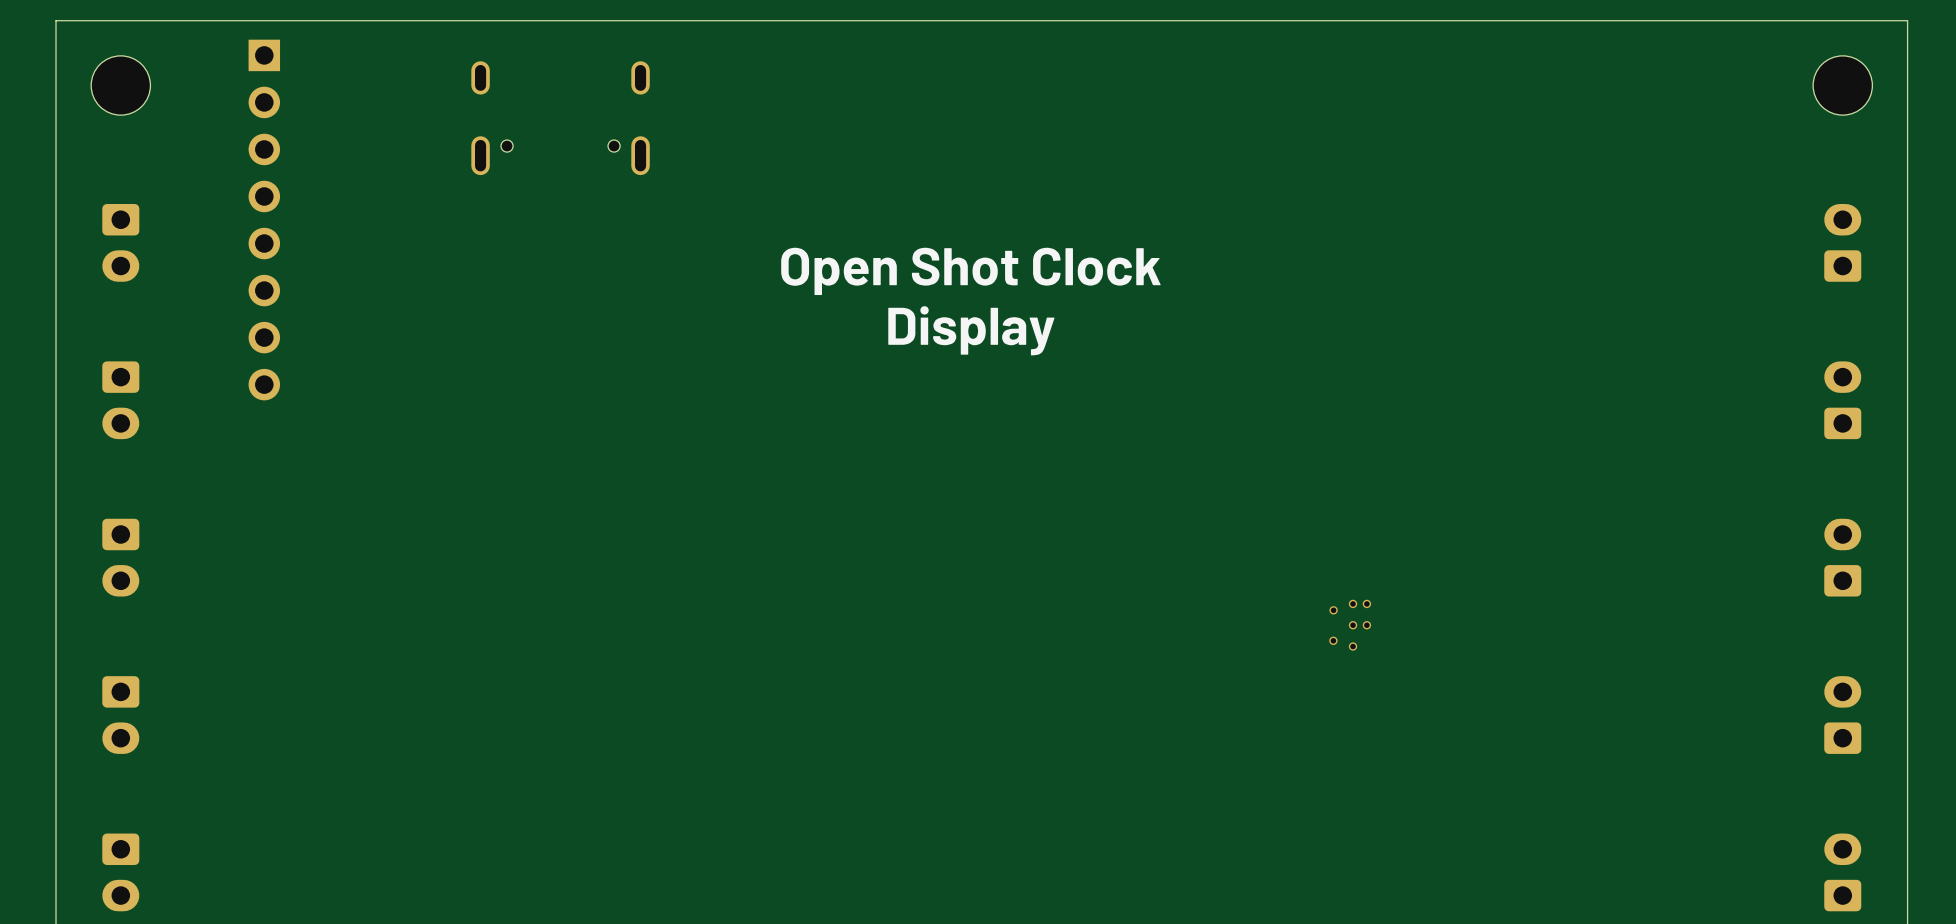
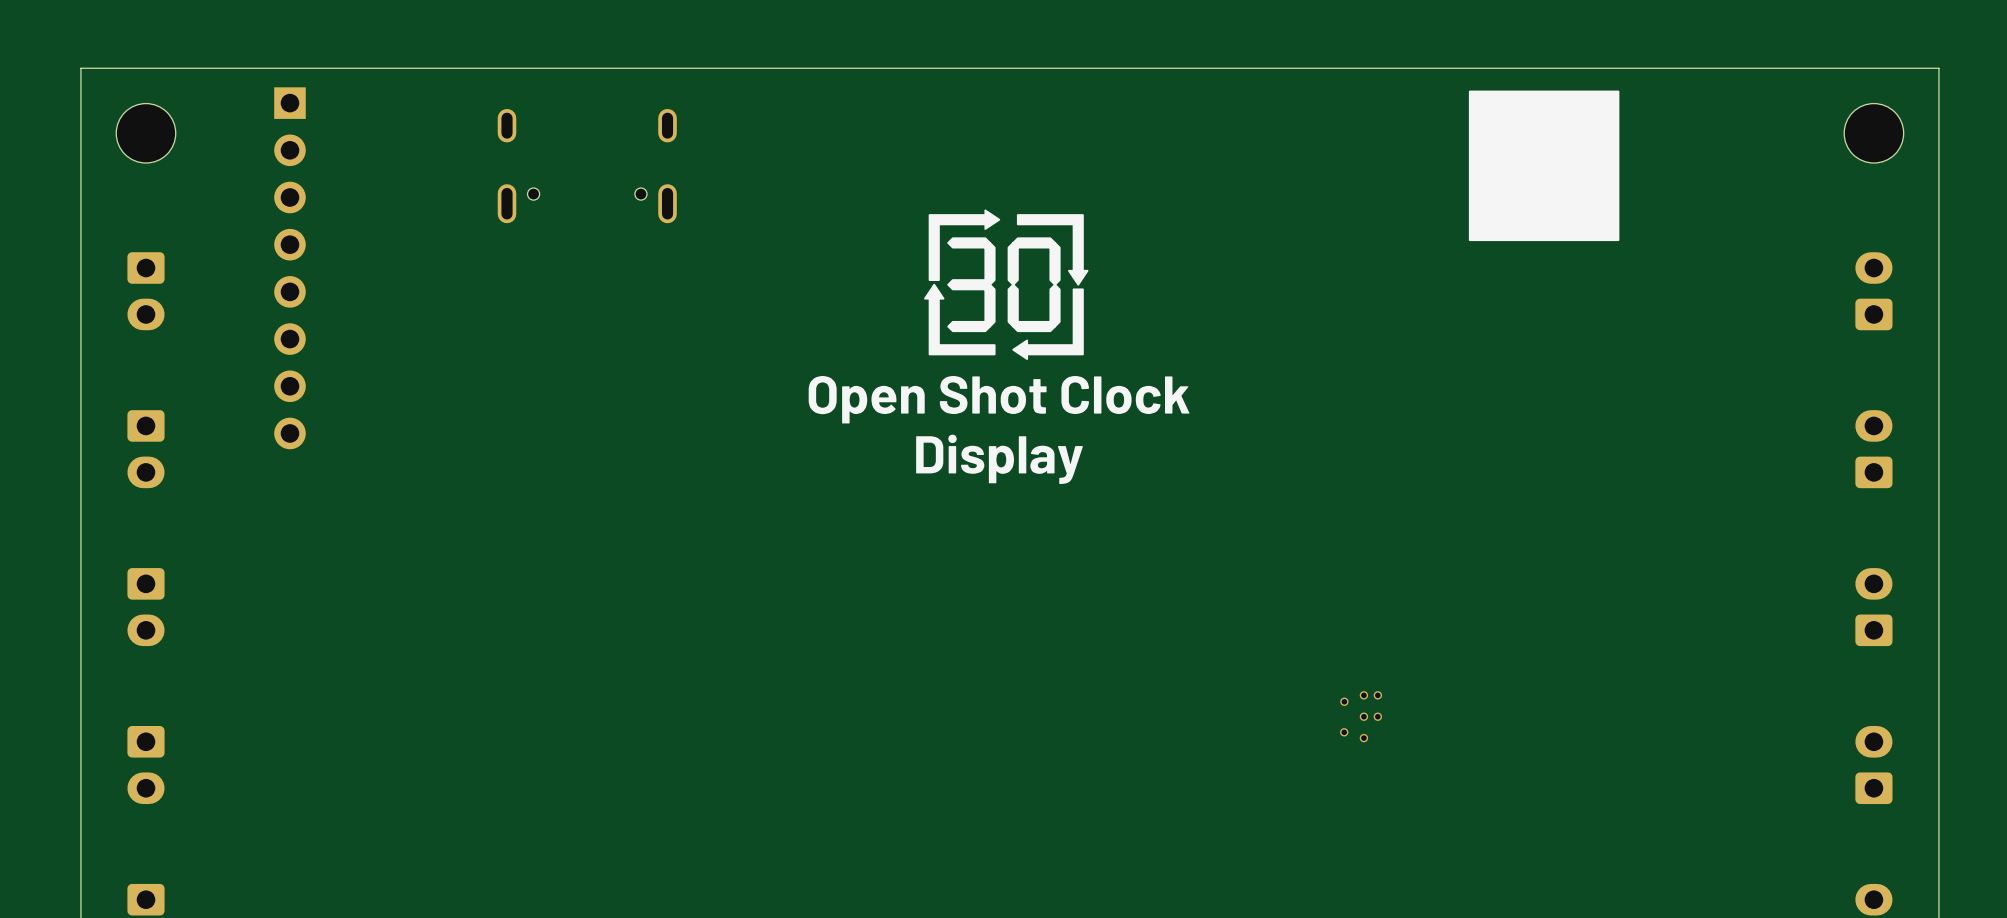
drawing: none -> [1468, 90, 1620, 242]
drawing: none -> [924, 209, 1089, 360]
text position: Open Shot Clock (970, 271) -> Open Shot Clock (999, 399)
text position: Display (971, 330) -> Display (999, 459)
part position: (1350, 625) -> (1361, 716)

